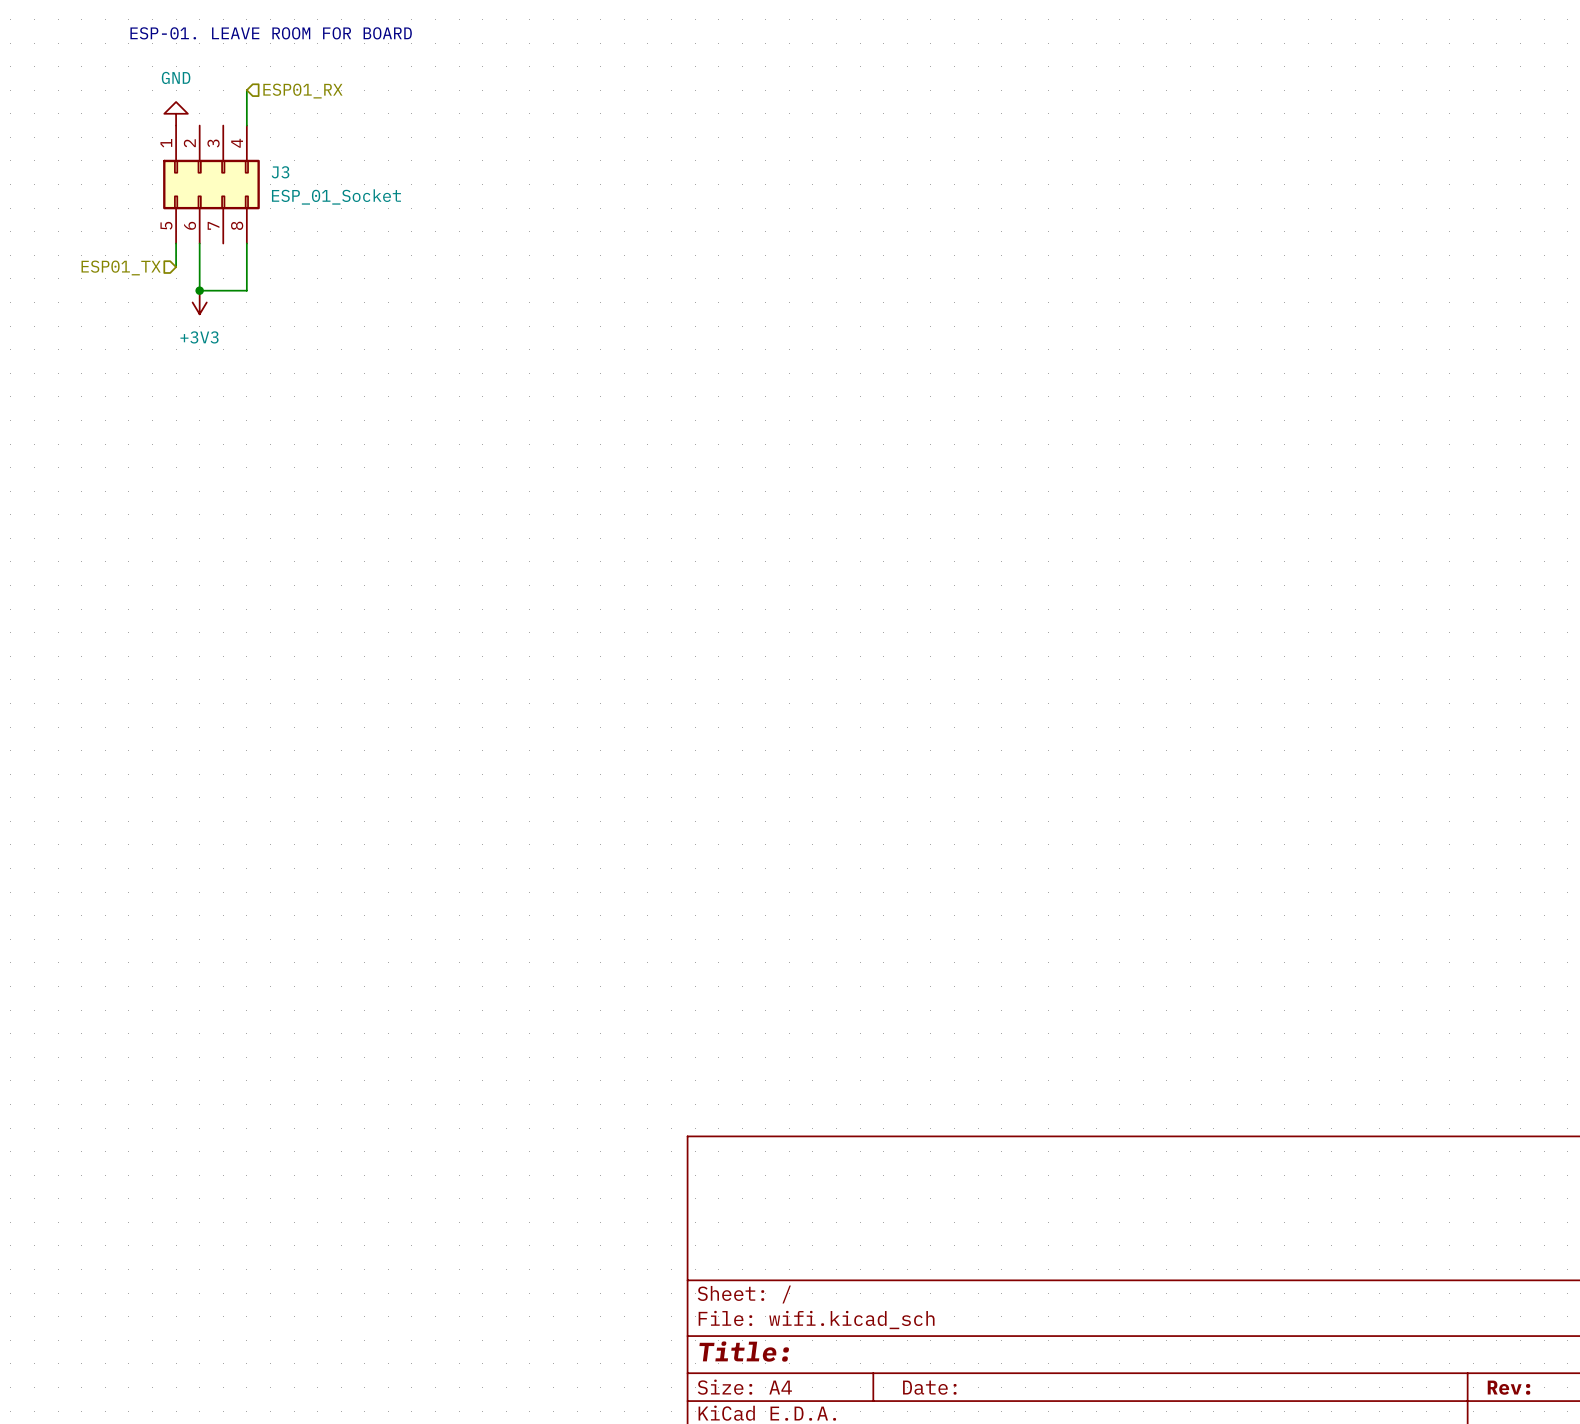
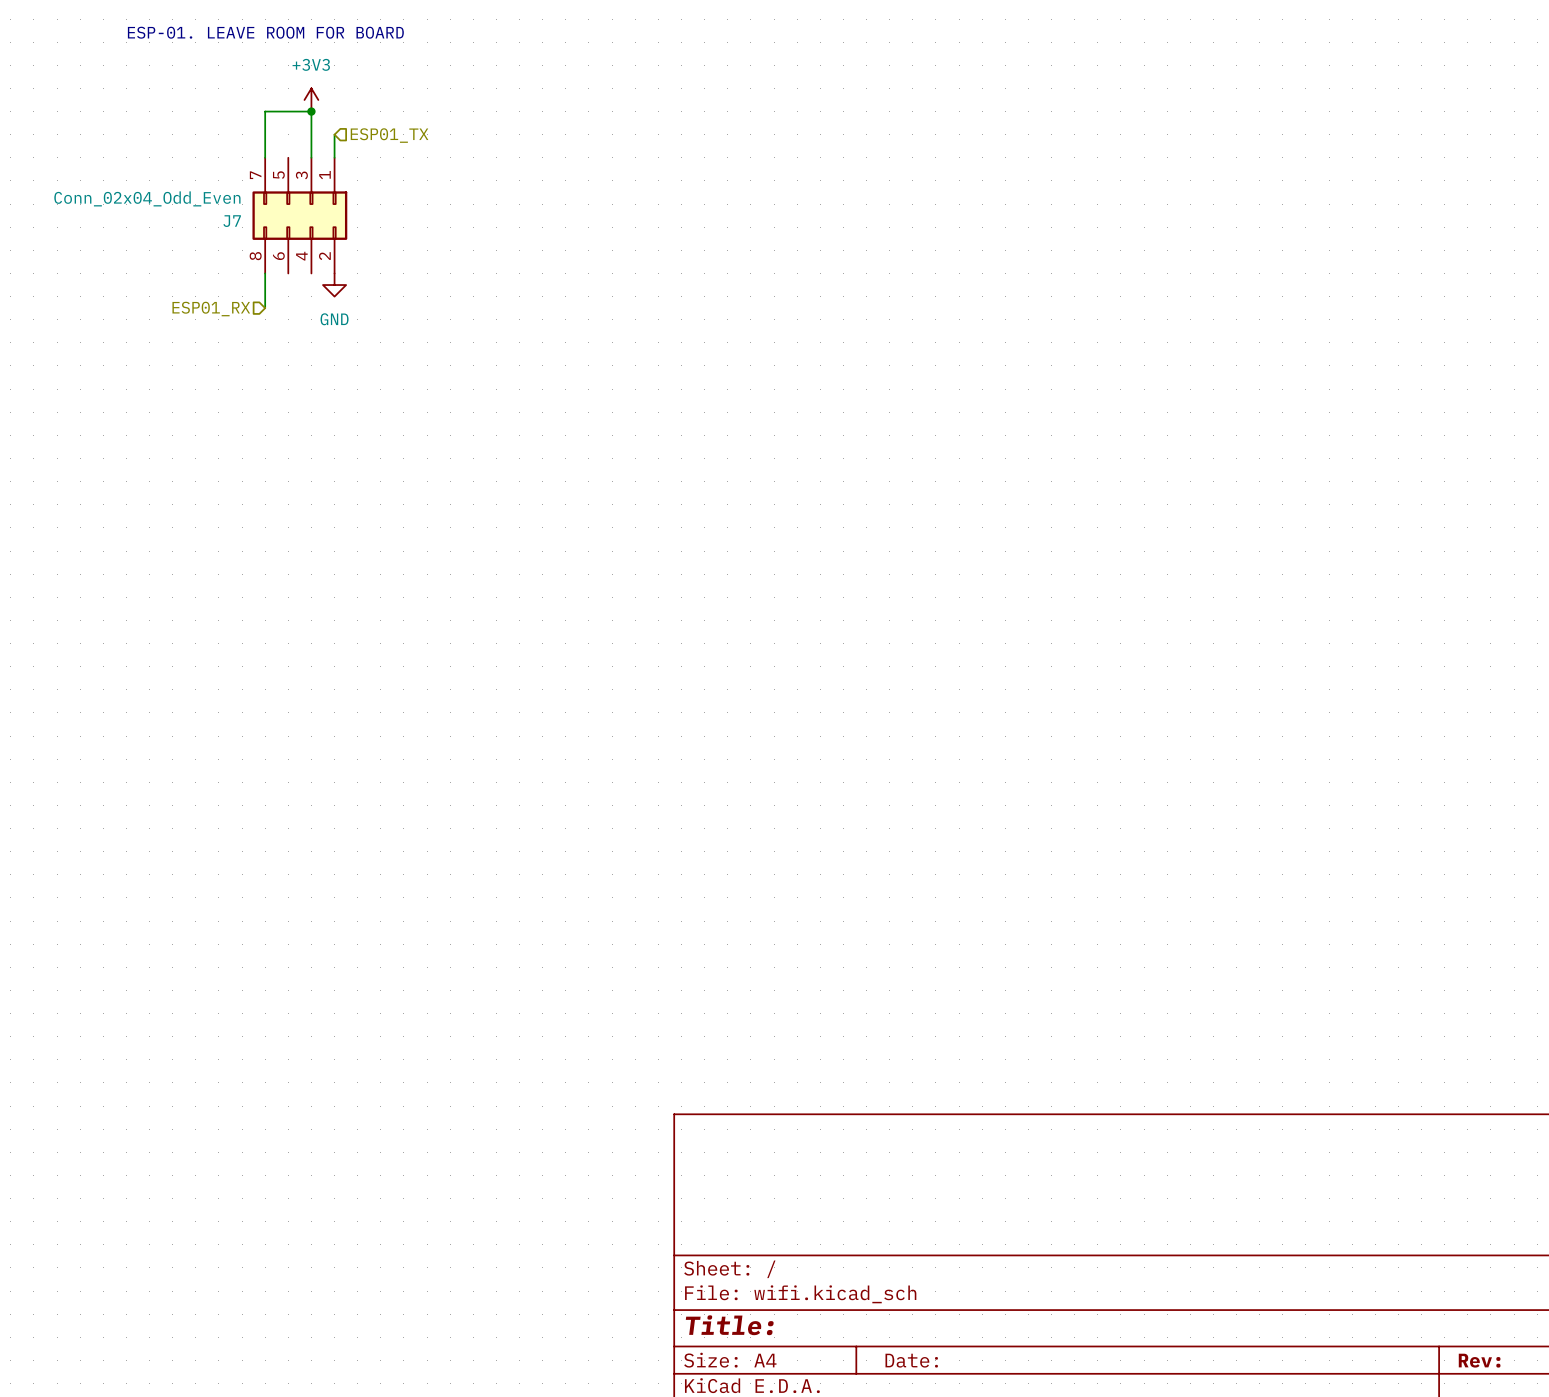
wire: (246, 90) (246, 125) -> (265, 273) (265, 308)
hierarchical label rotation: 0° (302, 91) -> 180° (211, 309)
hierarchical label position: ESP01_RX (302, 91) -> ESP01_RX (211, 309)
power symbol: none -> +3V3 (311, 99)
power symbol: GND (176, 113) -> none
junction: none -> (311, 111)
hierarchical label: none -> ESP01_TX (389, 135)
wire: none -> (265, 157) (265, 111) (311, 111) (311, 157)
J3: ESP_01_Socket (211, 184) -> none
J7: none -> Conn_02x04_Odd_Even (299, 215)
wire: (176, 243) (176, 267) -> (334, 134) (334, 157)
wire: (199, 243) (199, 290) (246, 290) (246, 243) -> none
hierarchical label: ESP01_TX (121, 267) -> none
junction: (199, 290) -> none
power symbol: none -> GND (334, 285)
power symbol: +3V3 (199, 302) -> none

